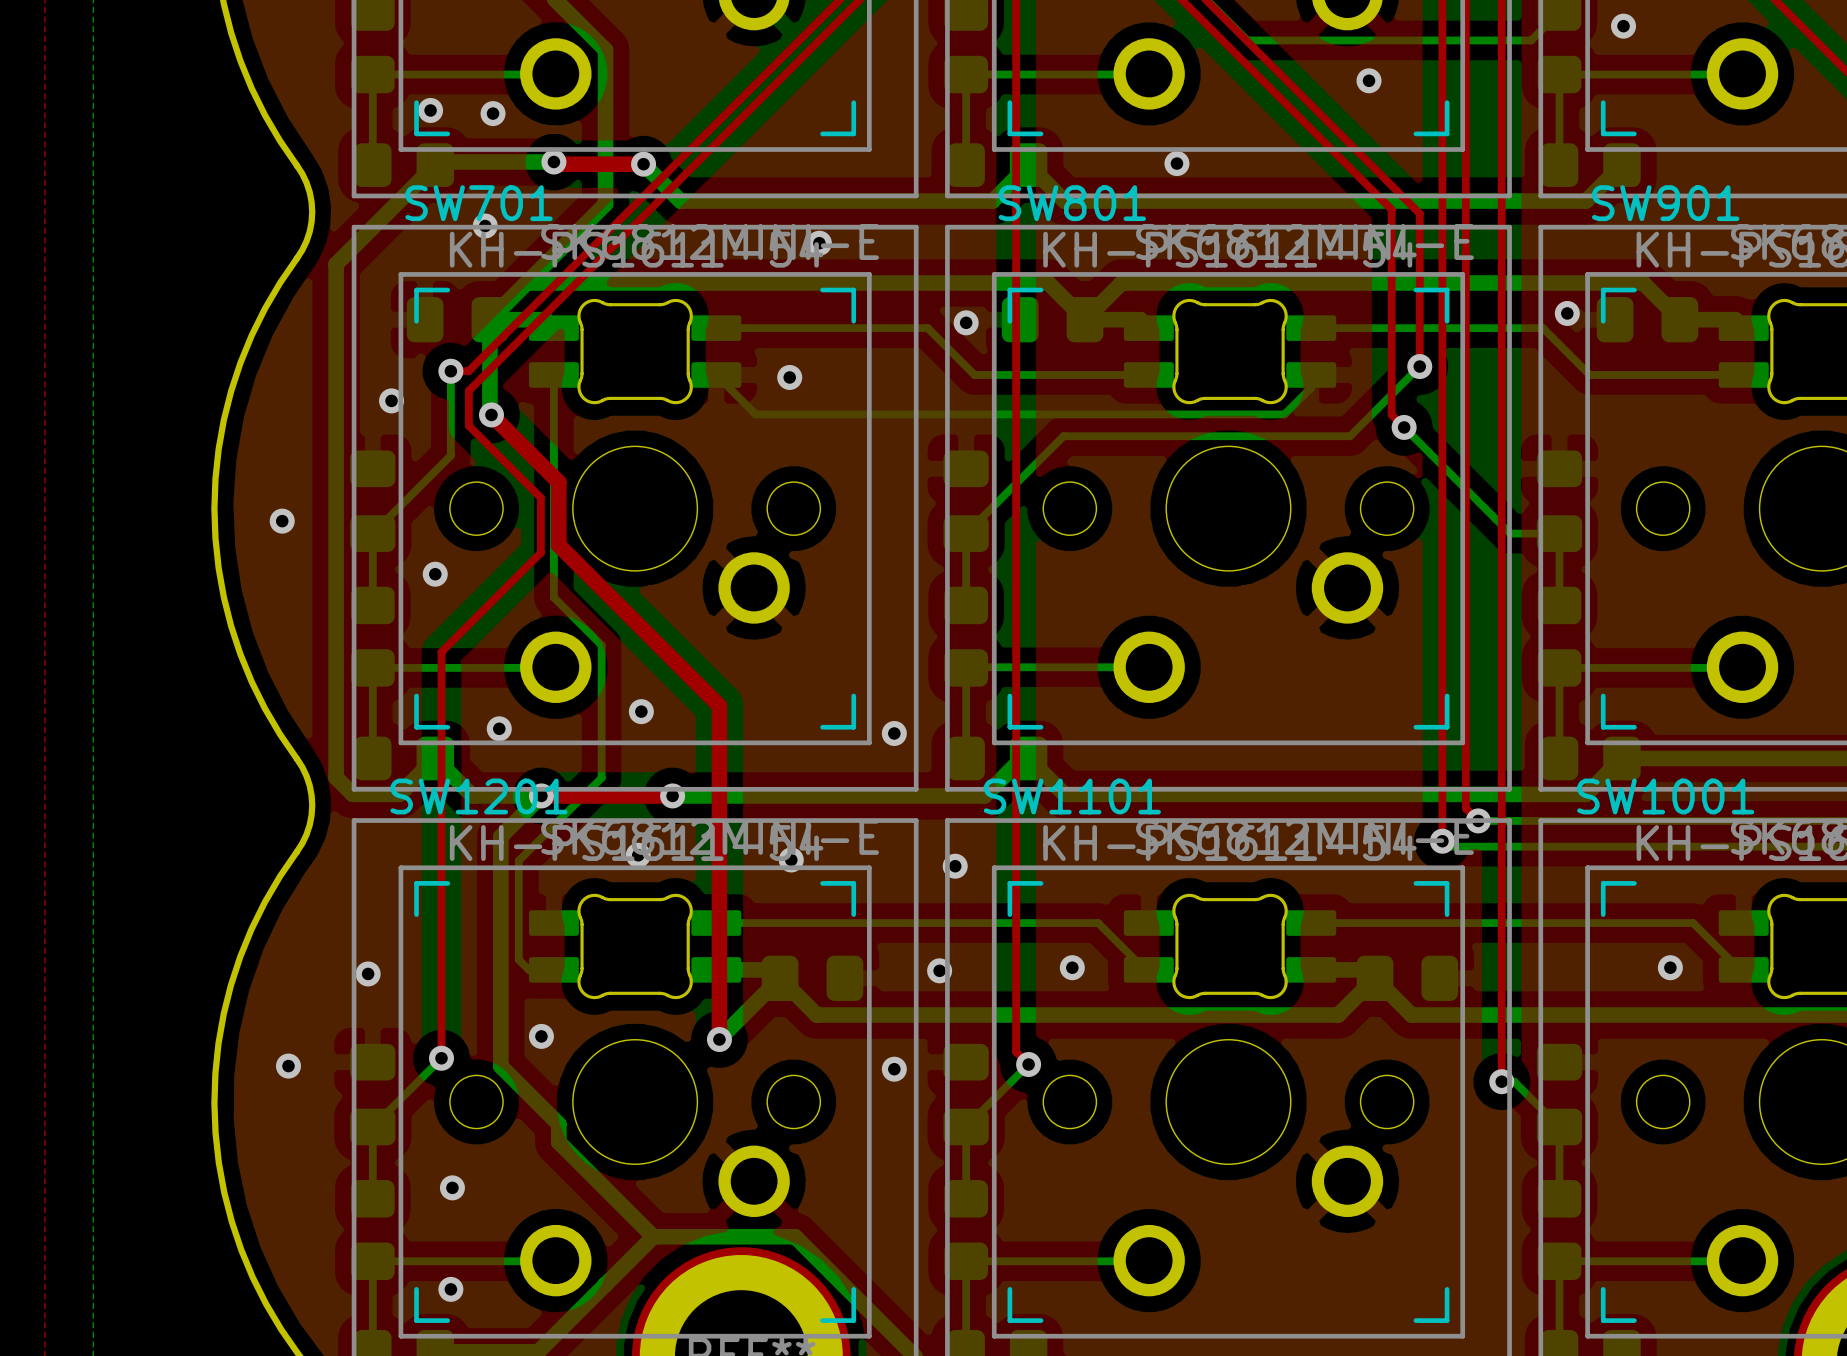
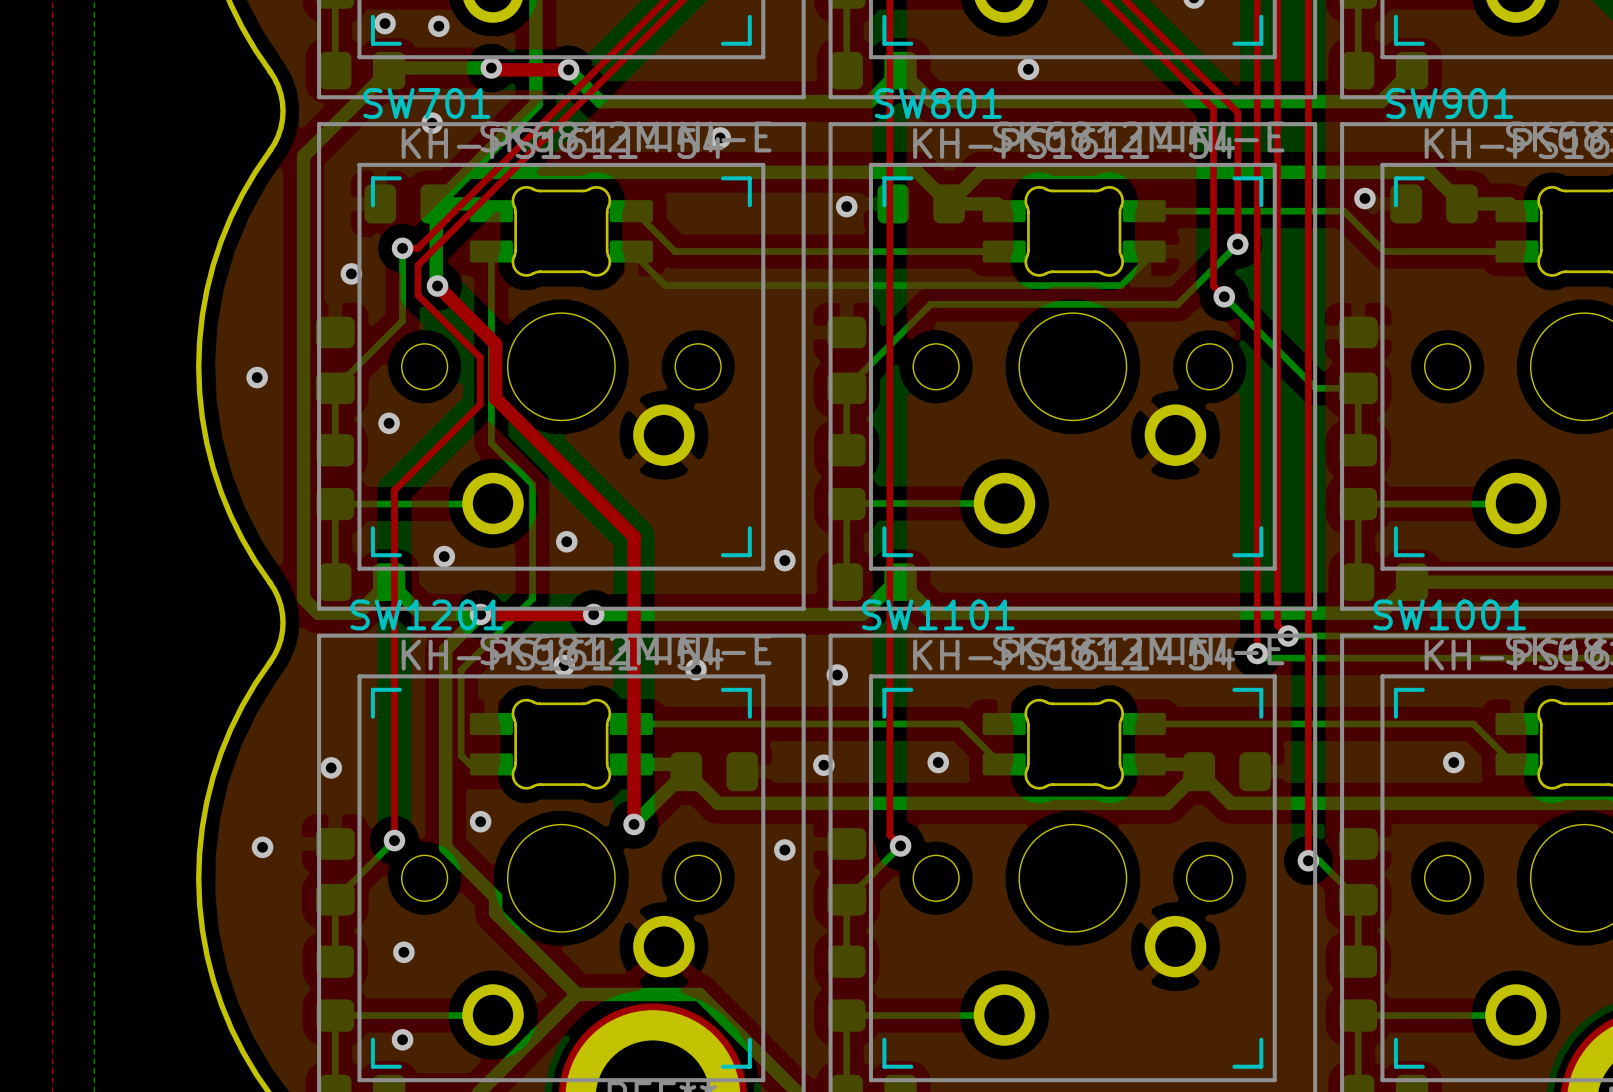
bottom track: (720, 328) (927, 328) (974, 374) -> (634, 211) (675, 251) (854, 251)
via: (789, 377) -> none

